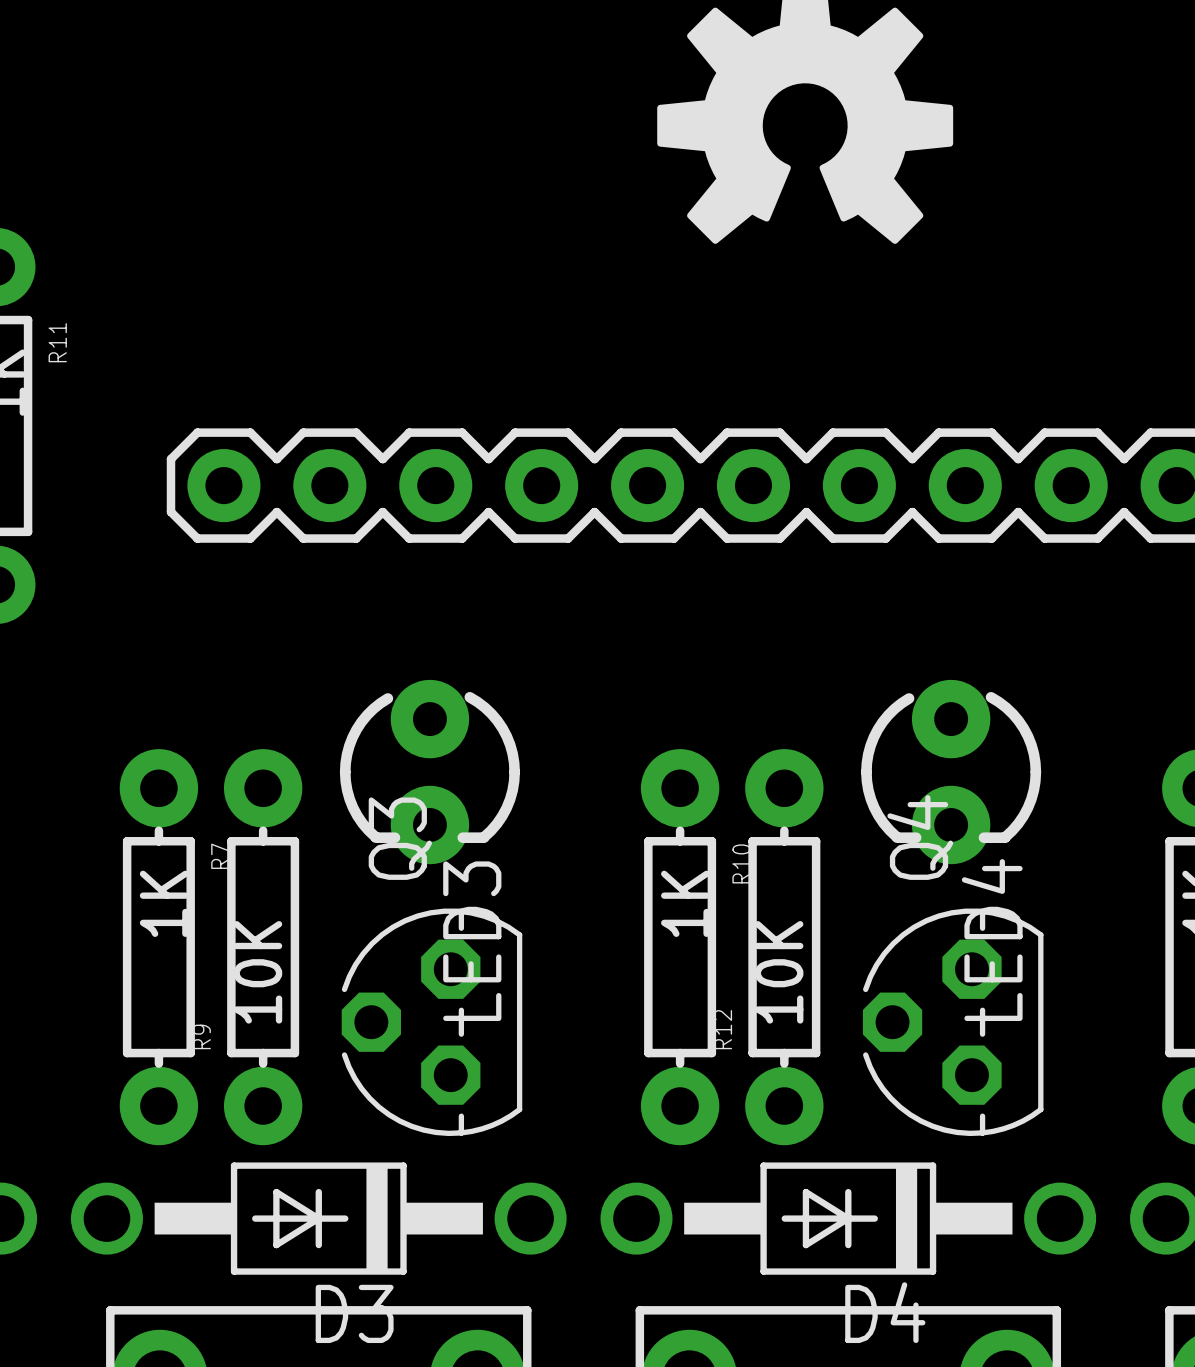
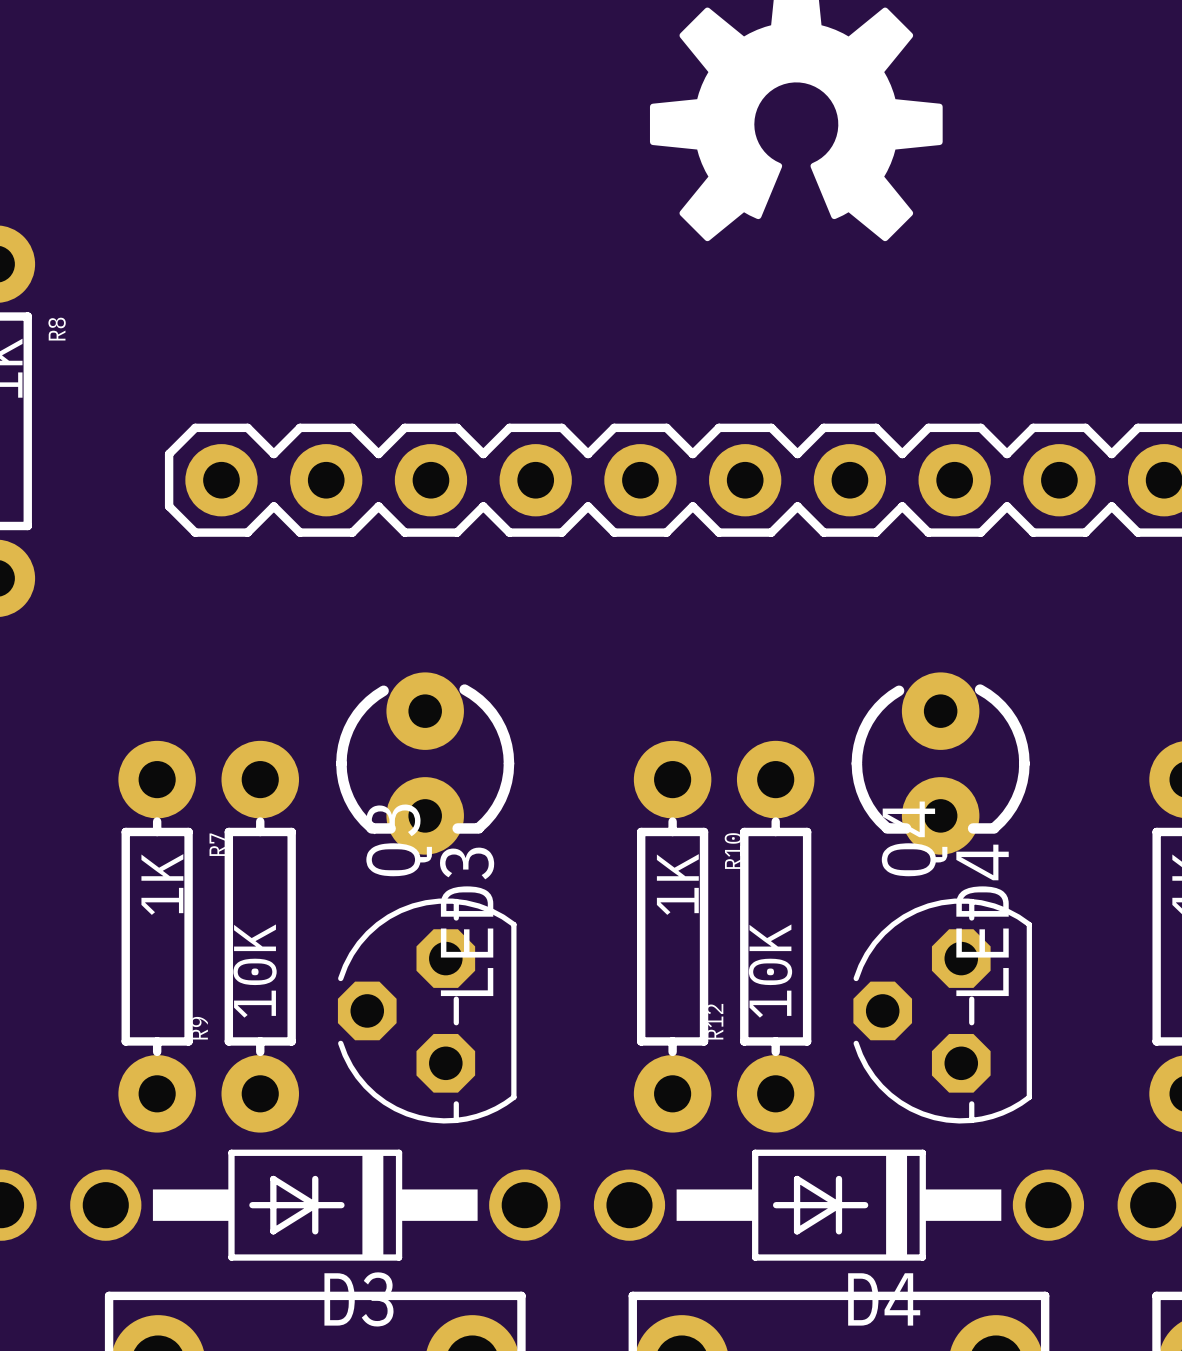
R11 name: R11 (57, 342) -> R8 (57, 329)

